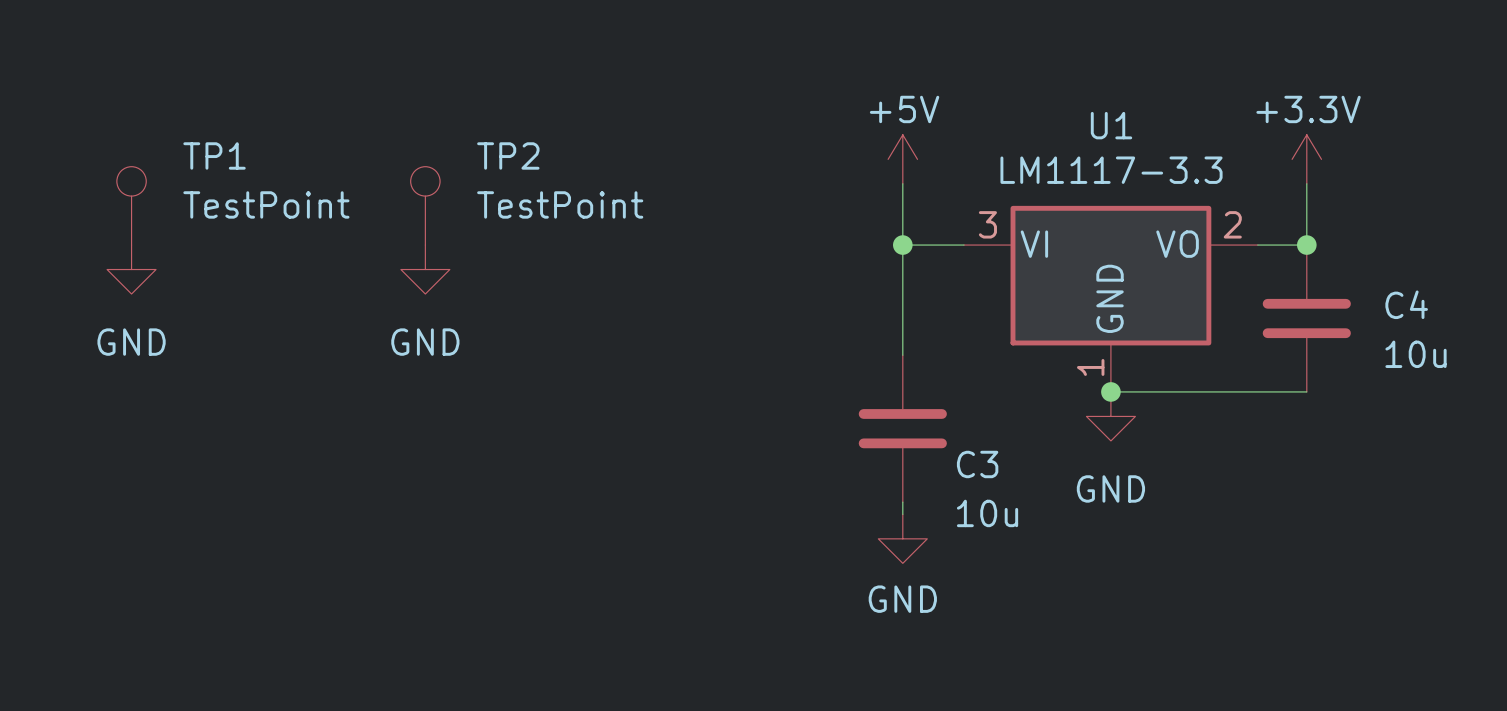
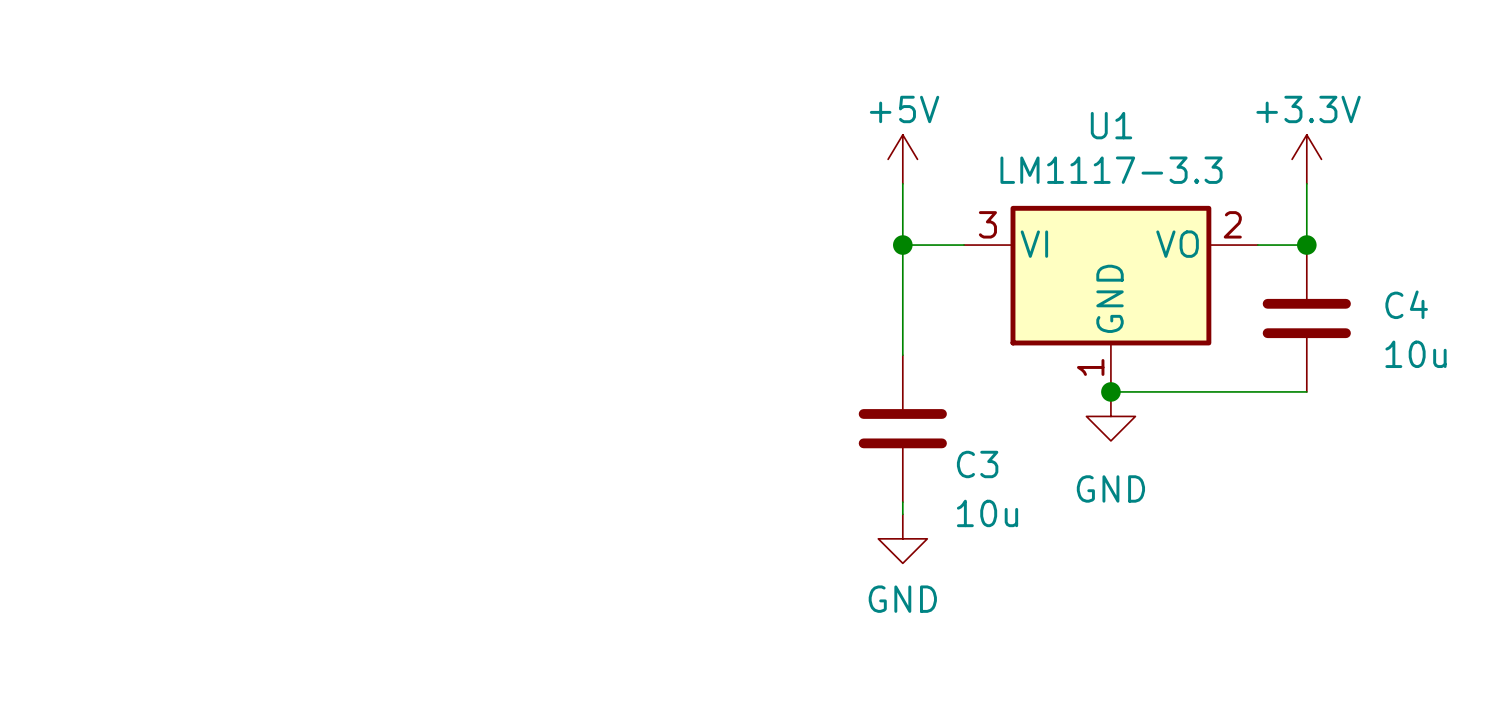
TP1: TestPoint (131, 205) -> none
TP2: TestPoint (425, 205) -> none
power symbol: GND (131, 269) -> none
power symbol: GND (425, 269) -> none

